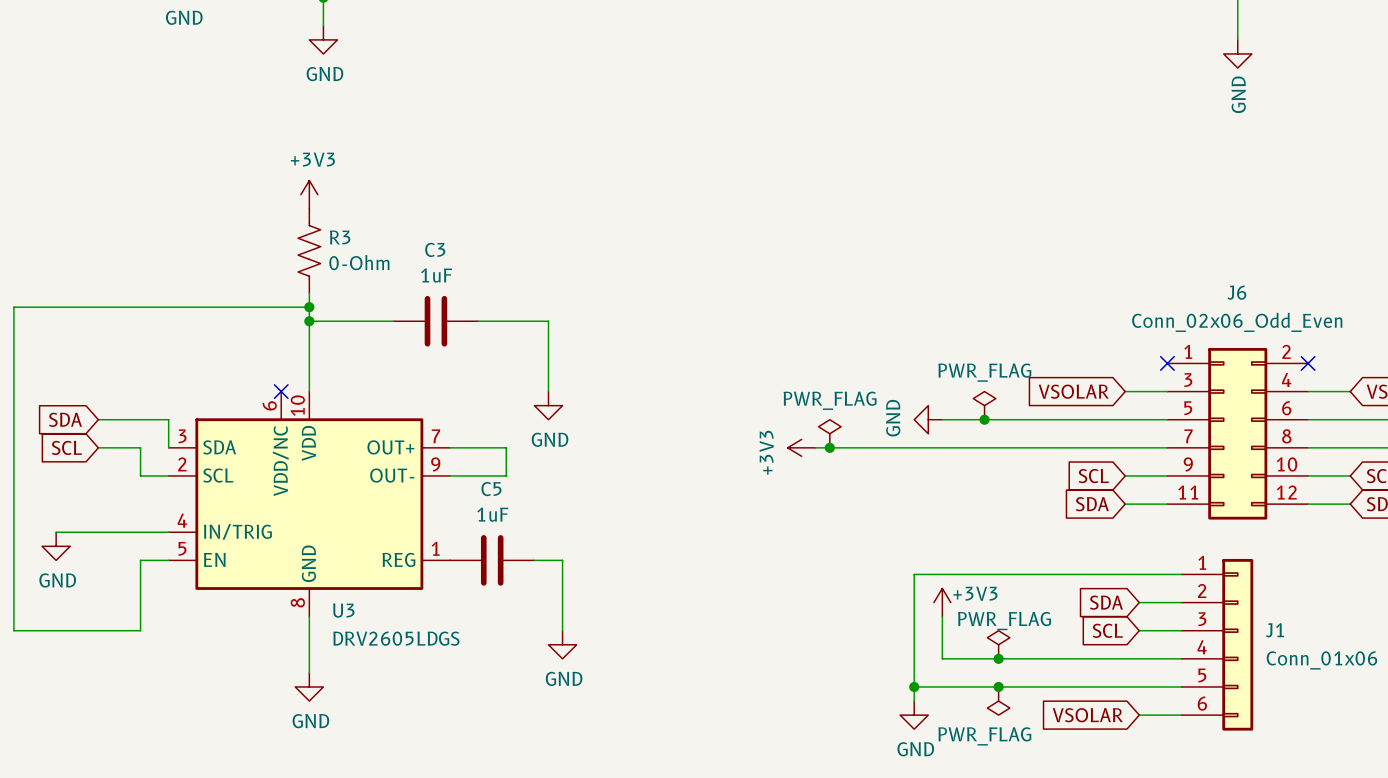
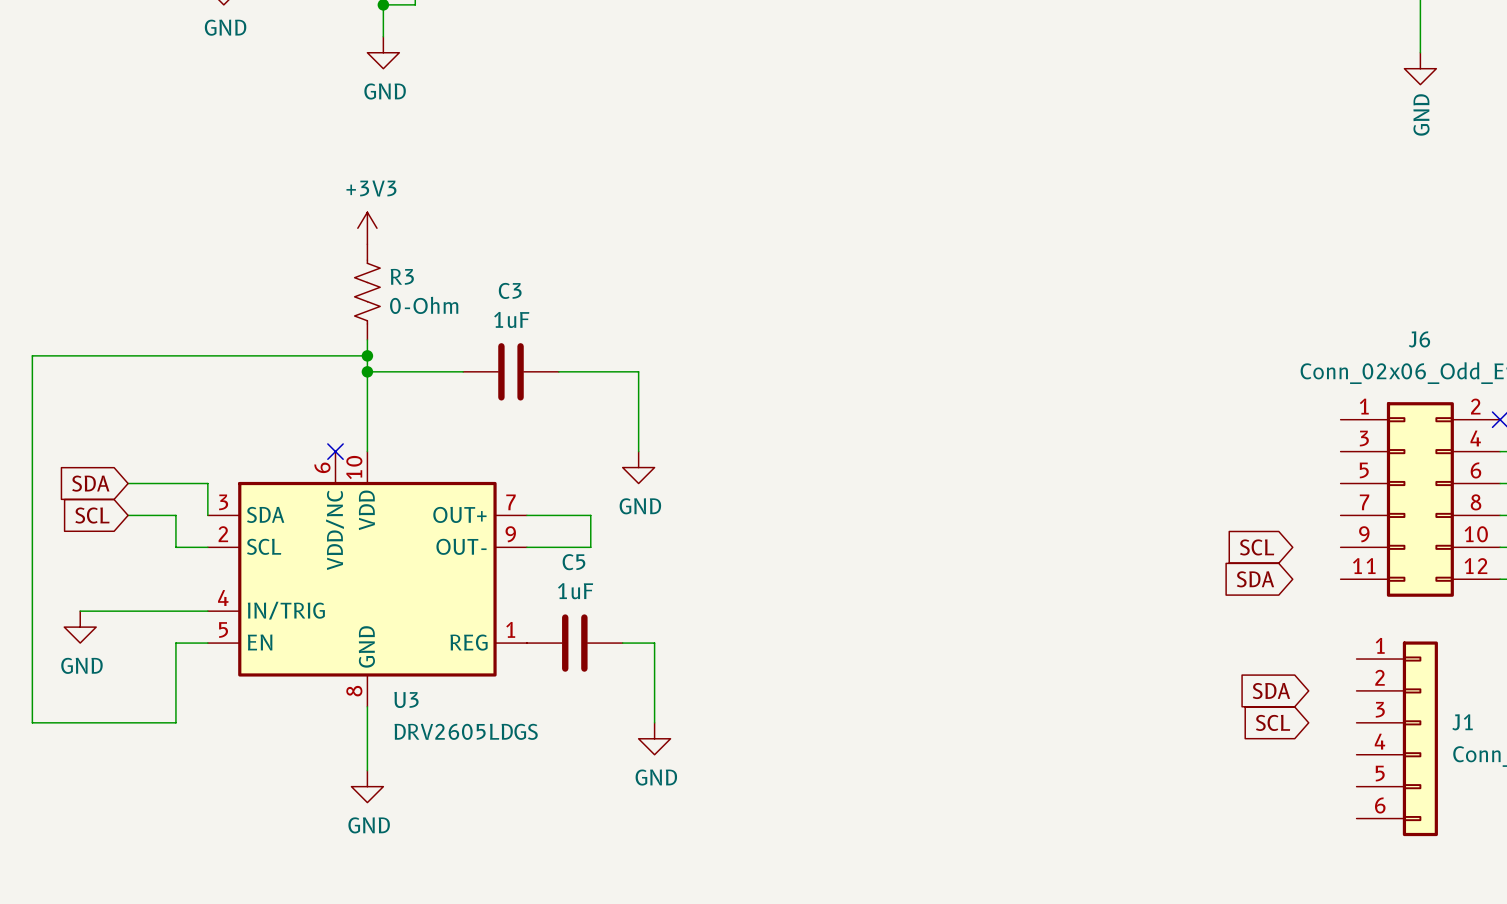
no-connect mark: (1167, 363) -> none
global label: VSOLAR (1073, 391) -> none
wire: (1125, 391) (1167, 391) -> none
power symbol: PWR_FLAG (984, 405) -> none
power symbol: GND (928, 419) -> none
wire: (942, 419) (1167, 419) -> none
junction: (984, 419) -> none
power symbol: PWR_FLAG (829, 433) -> none
power symbol: +3V3 (801, 447) -> none
wire: (815, 447) (1167, 447) -> none
junction: (829, 447) -> none
wire: (1125, 475) (1167, 475) -> none
wire: (1125, 504) (1167, 504) -> none
wire: (1181, 574) (914, 574) (914, 701) -> none
power symbol: +3V3 (942, 602) -> none
wire: (1139, 602) (1181, 602) -> none
wire: (942, 616) (942, 658) (1181, 658) -> none
wire: (1139, 630) (1181, 630) -> none
power symbol: PWR_FLAG (998, 644) -> none
junction: (998, 658) -> none
wire: (914, 686) (1181, 686) -> none
junction: (914, 686) -> none
junction: (998, 686) -> none
power symbol: PWR_FLAG (998, 701) -> none
power symbol: GND (914, 715) -> none
global label: VSOLAR (1087, 715) -> none
wire: (1139, 715) (1181, 715) -> none

